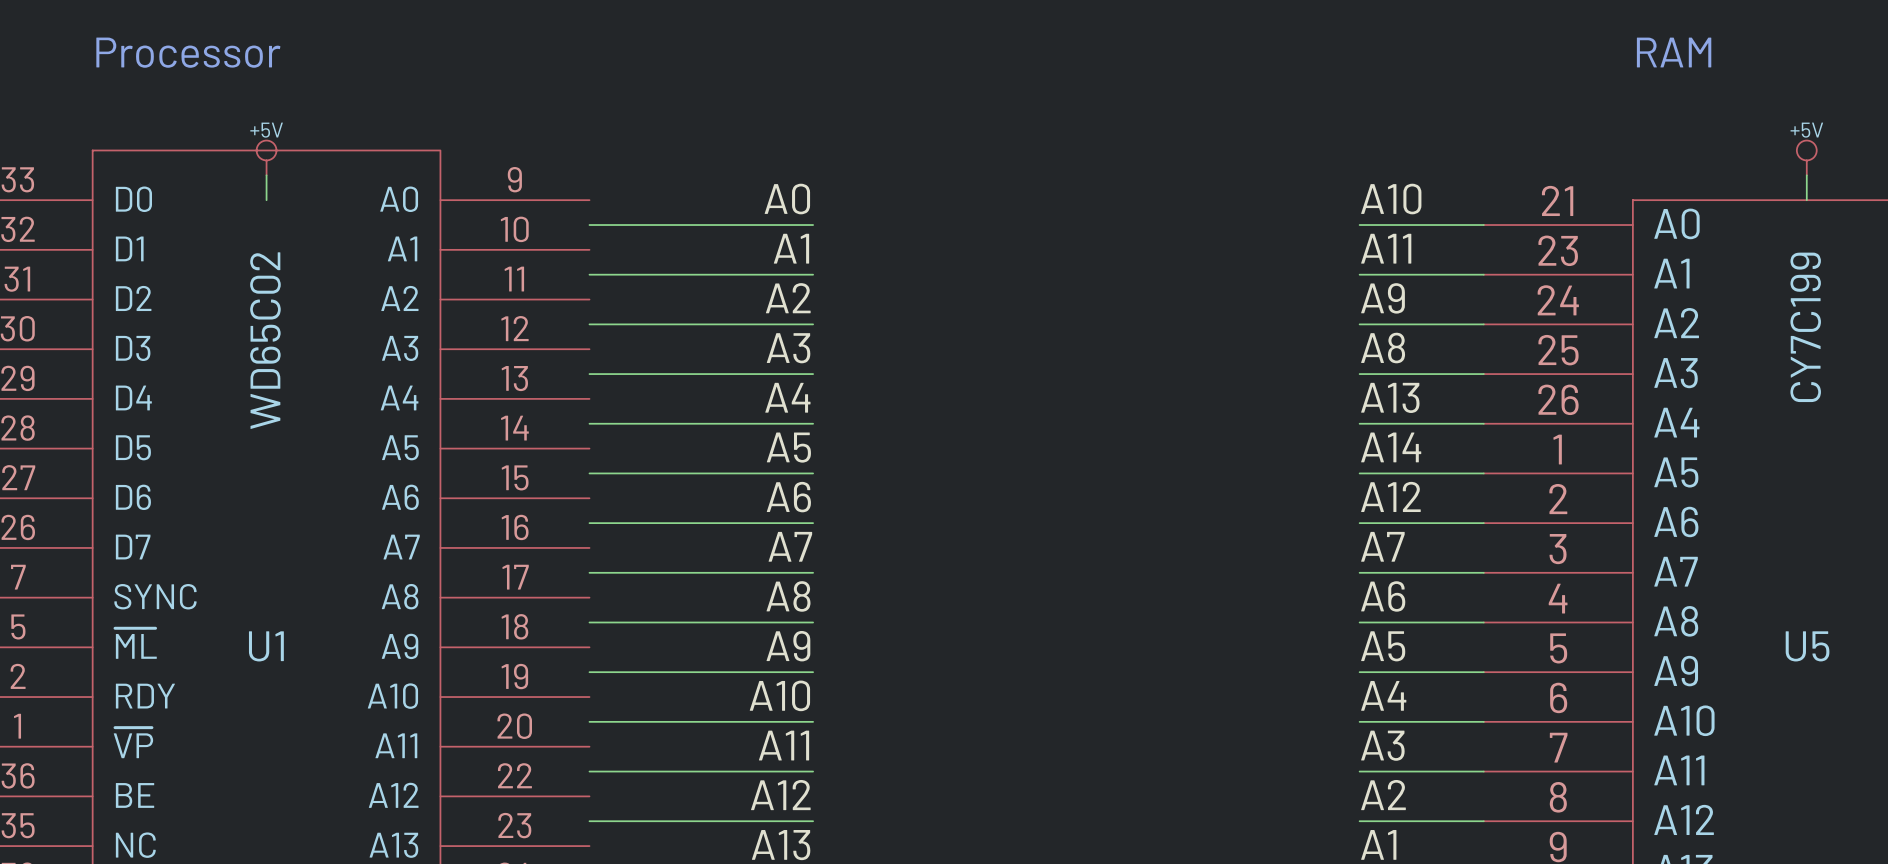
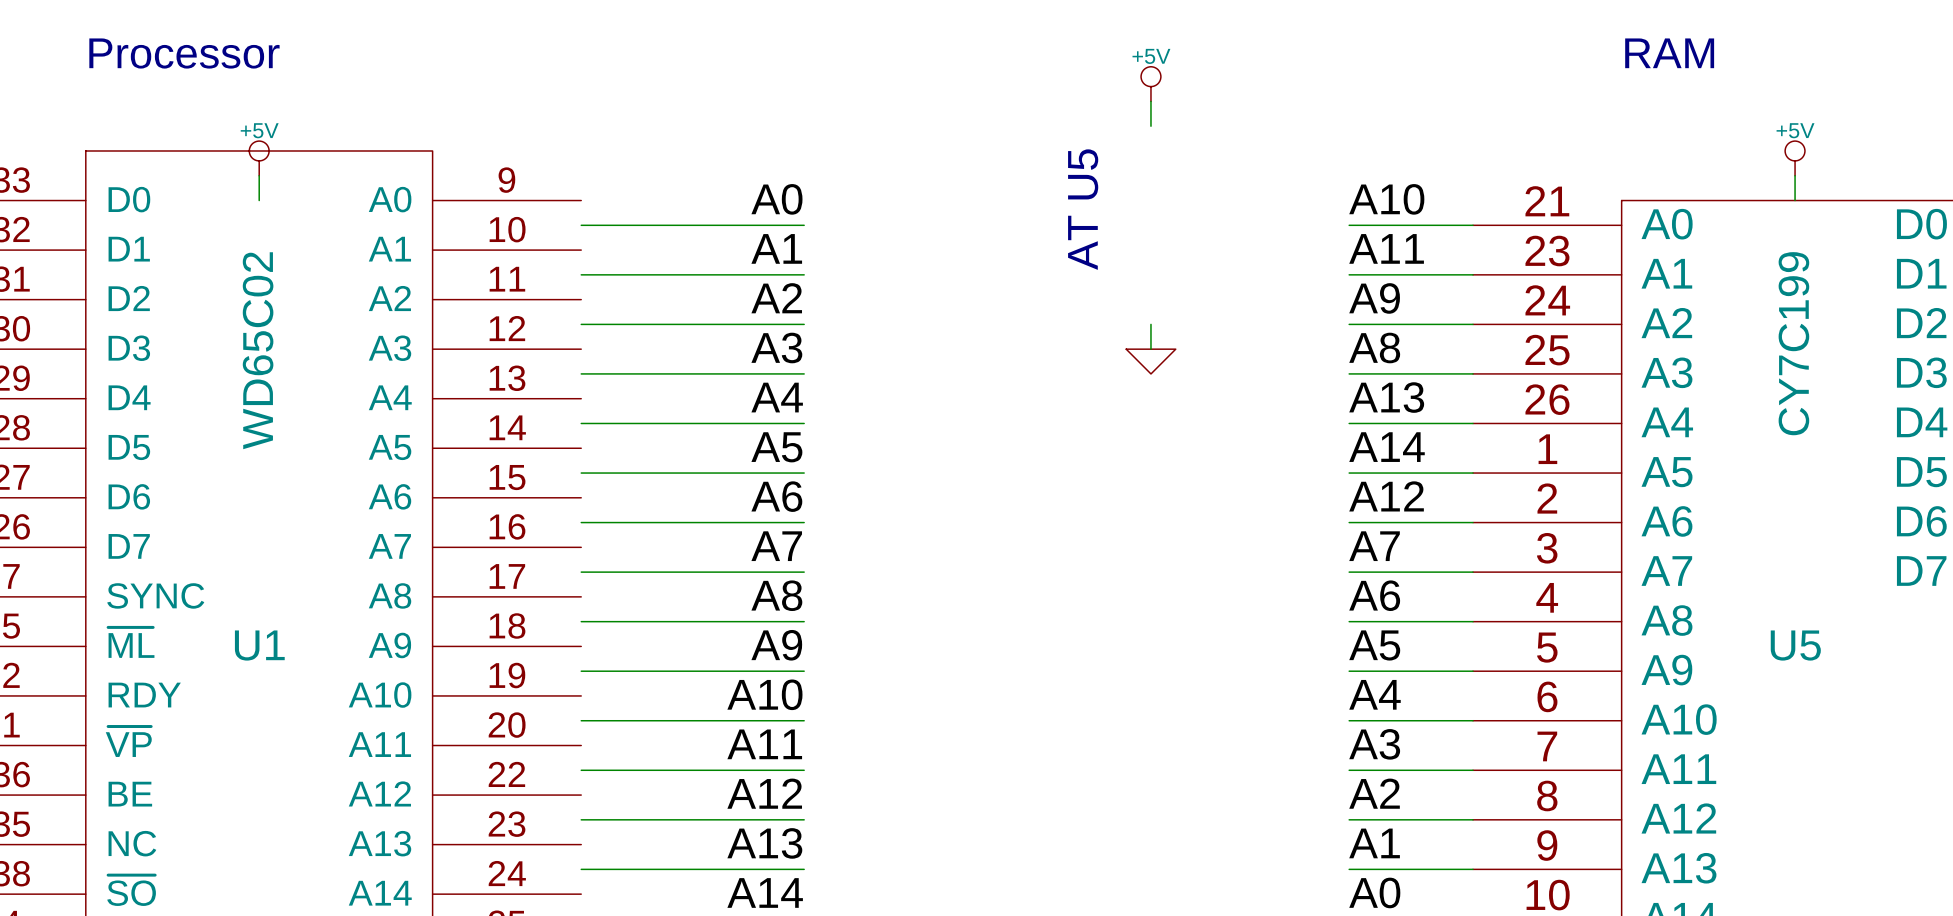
power symbol: none -> +5V (1150, 84)
wire: none -> (1150, 101) (1150, 126)
text: none -> AT U5 (1083, 209)
wire: none -> (1150, 324) (1150, 349)
power symbol: none -> (1150, 361)

